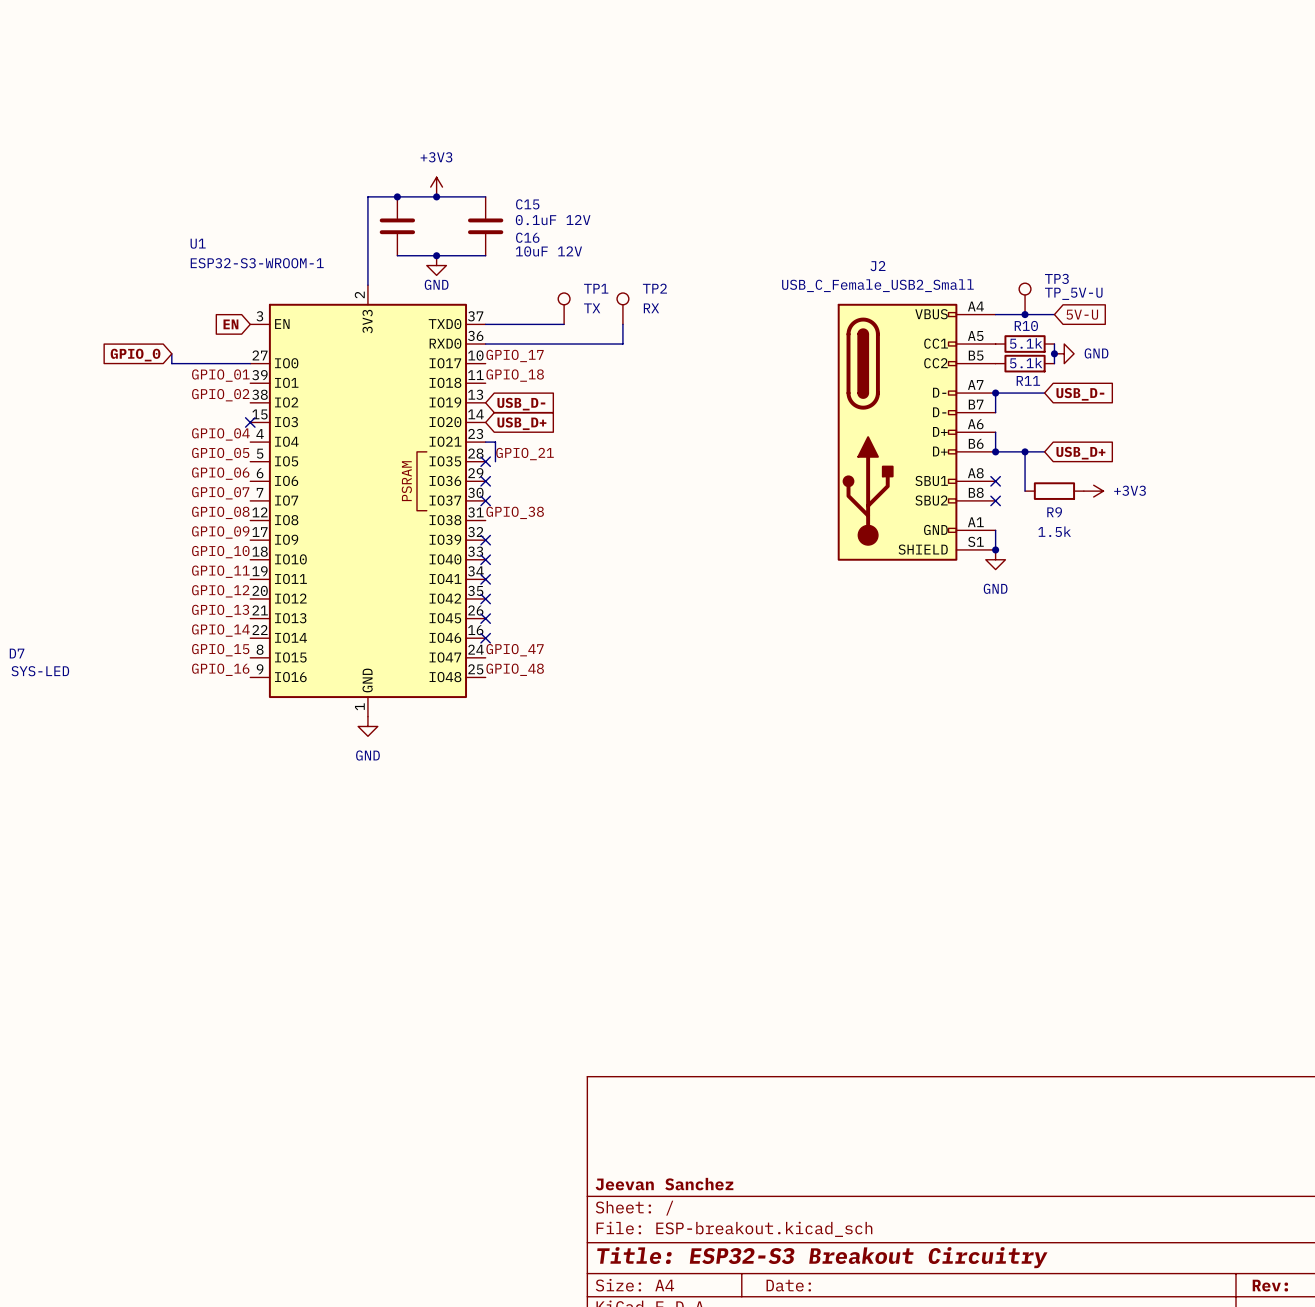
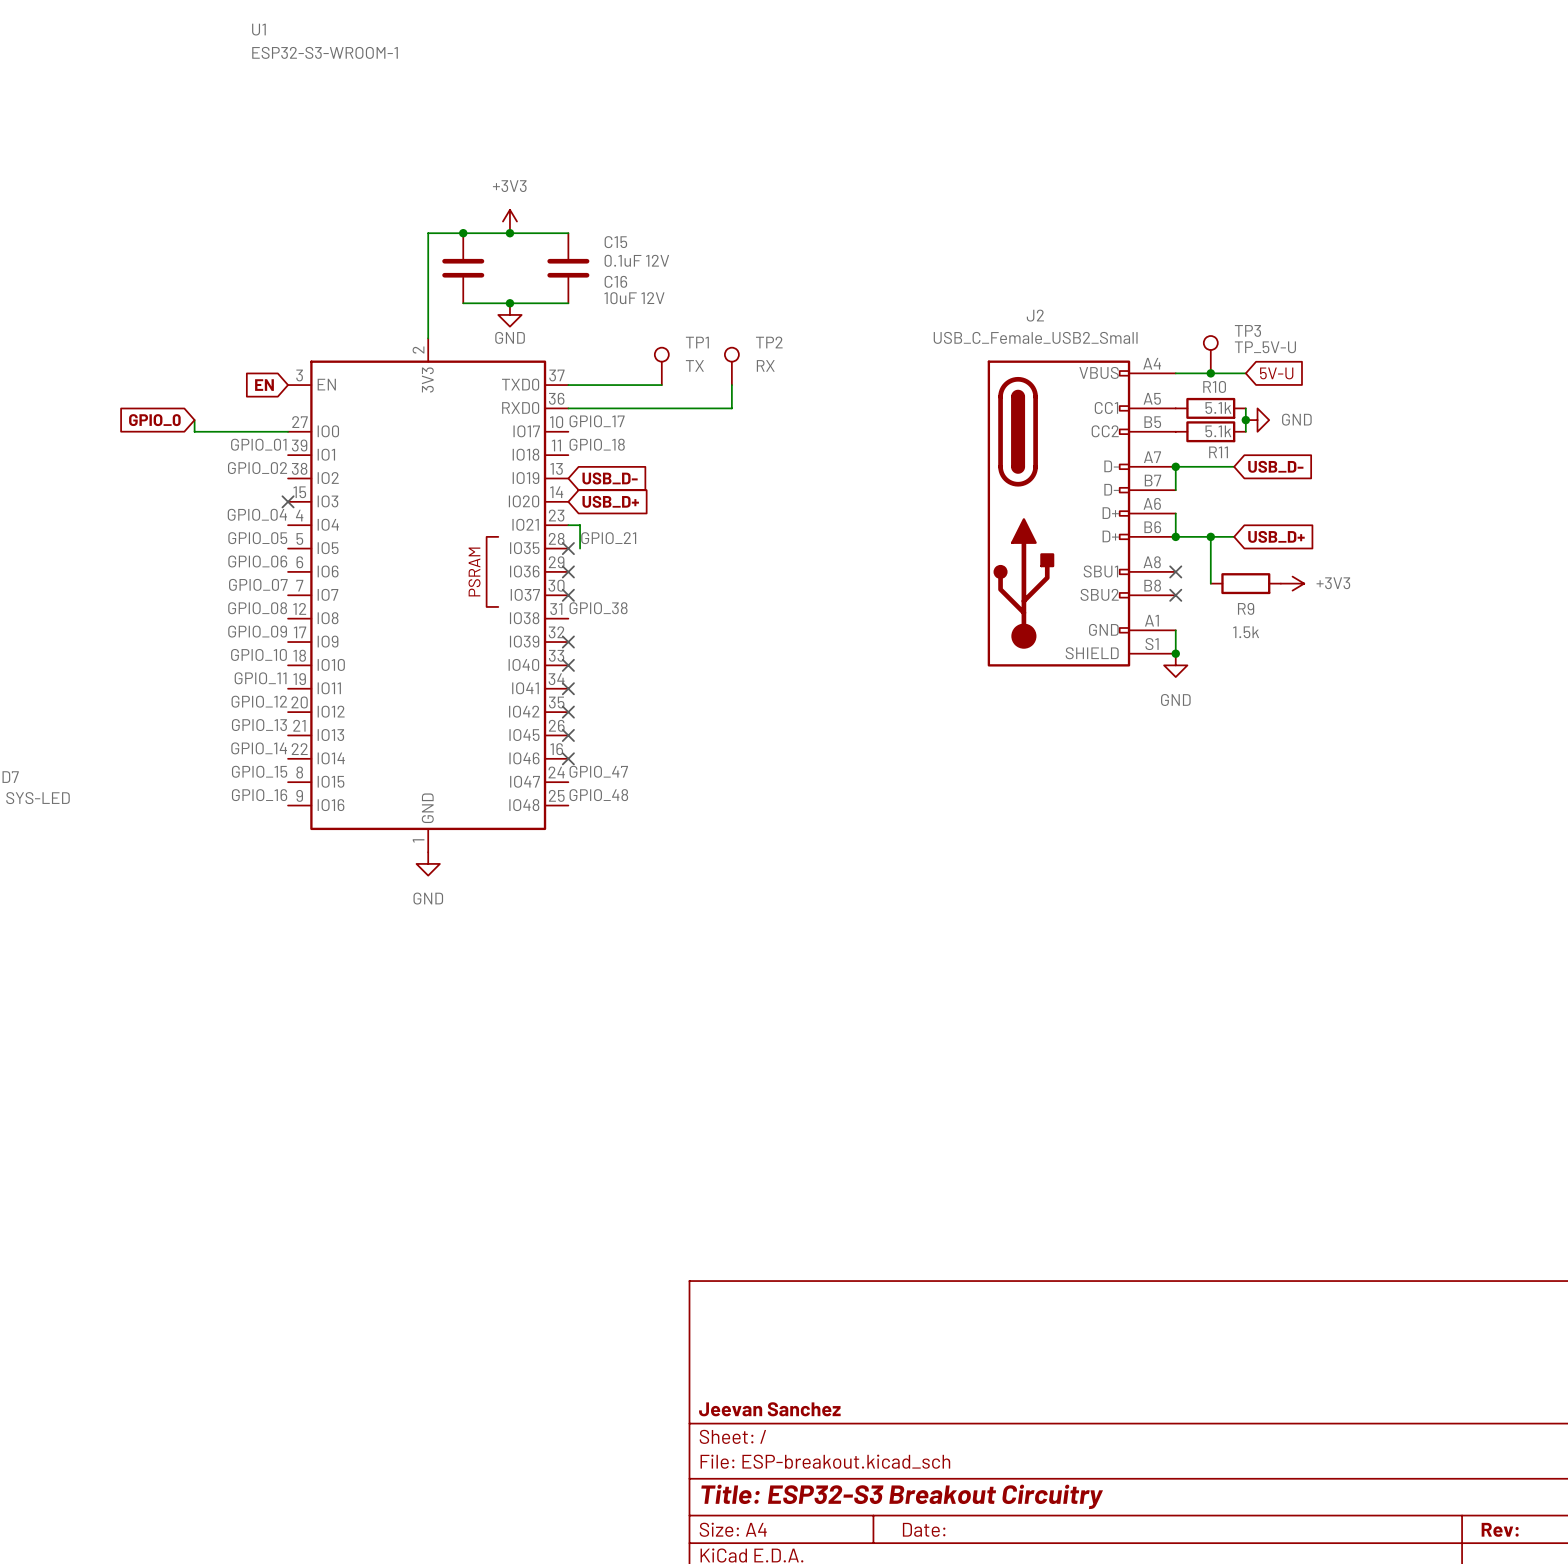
U1 name position: U1 (198, 243) -> U1 (258, 29)
U1 value position: ESP32-S3-WROOM-1 (257, 263) -> ESP32-S3-WROOM-1 (325, 52)

